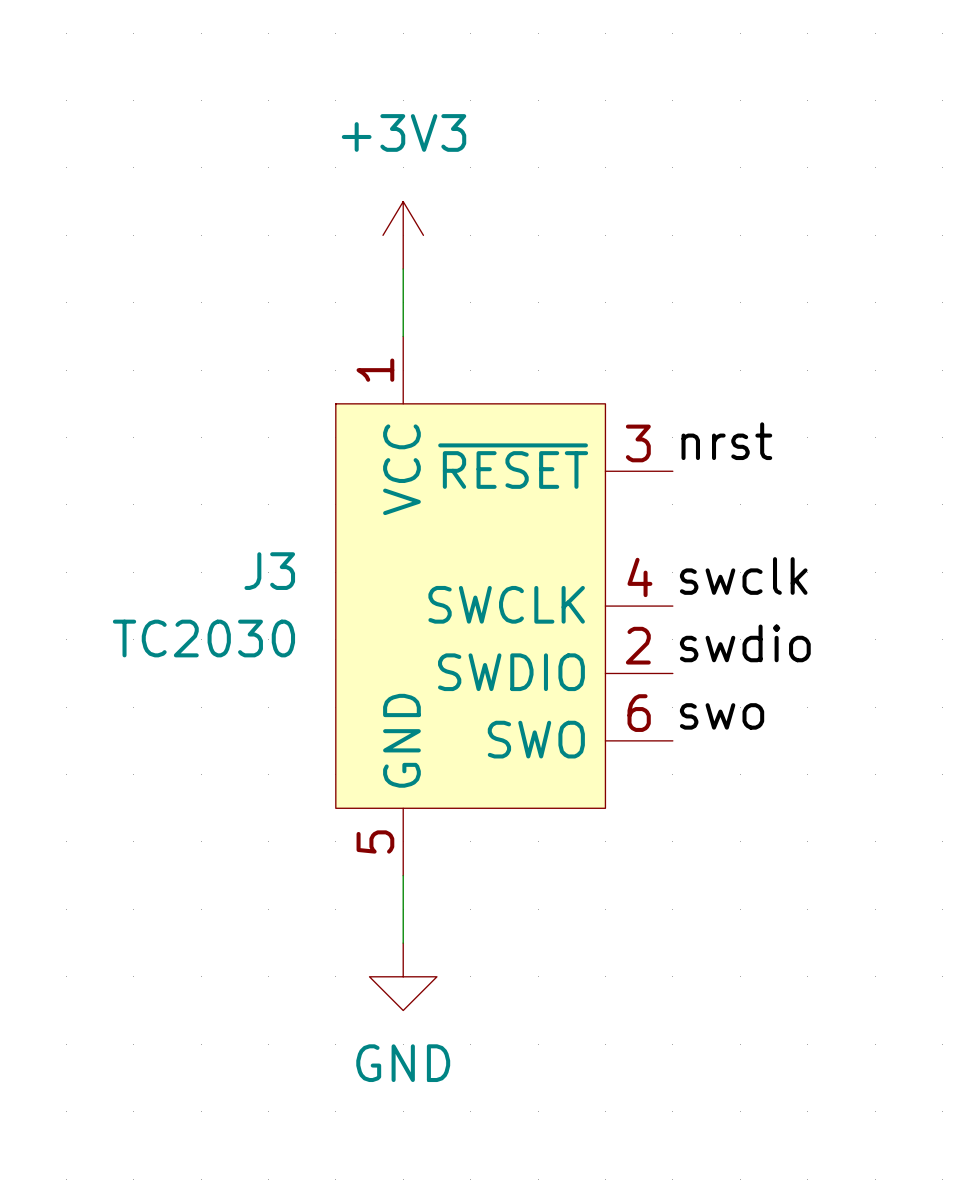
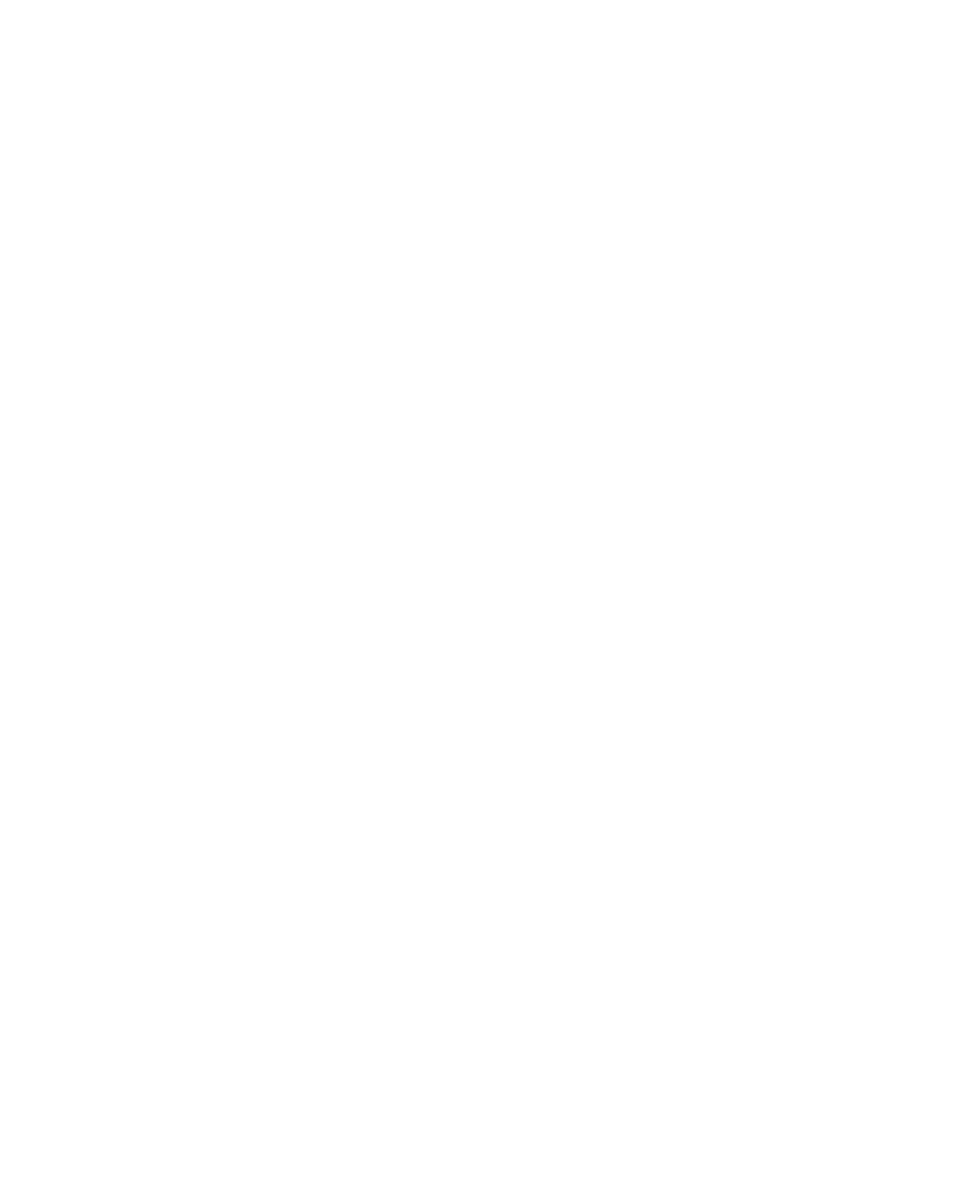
power symbol: +3V3 (403, 235) -> none
wire: (403, 269) (403, 336) -> none
label: nrst (726, 441) -> none
label: swclk (743, 575) -> none
J3: TC2030 (504, 606) -> none
label: swdio (745, 643) -> none
label: swo (722, 716) -> none
wire: (403, 875) (403, 943) -> none
power symbol: GND (403, 976) -> none

